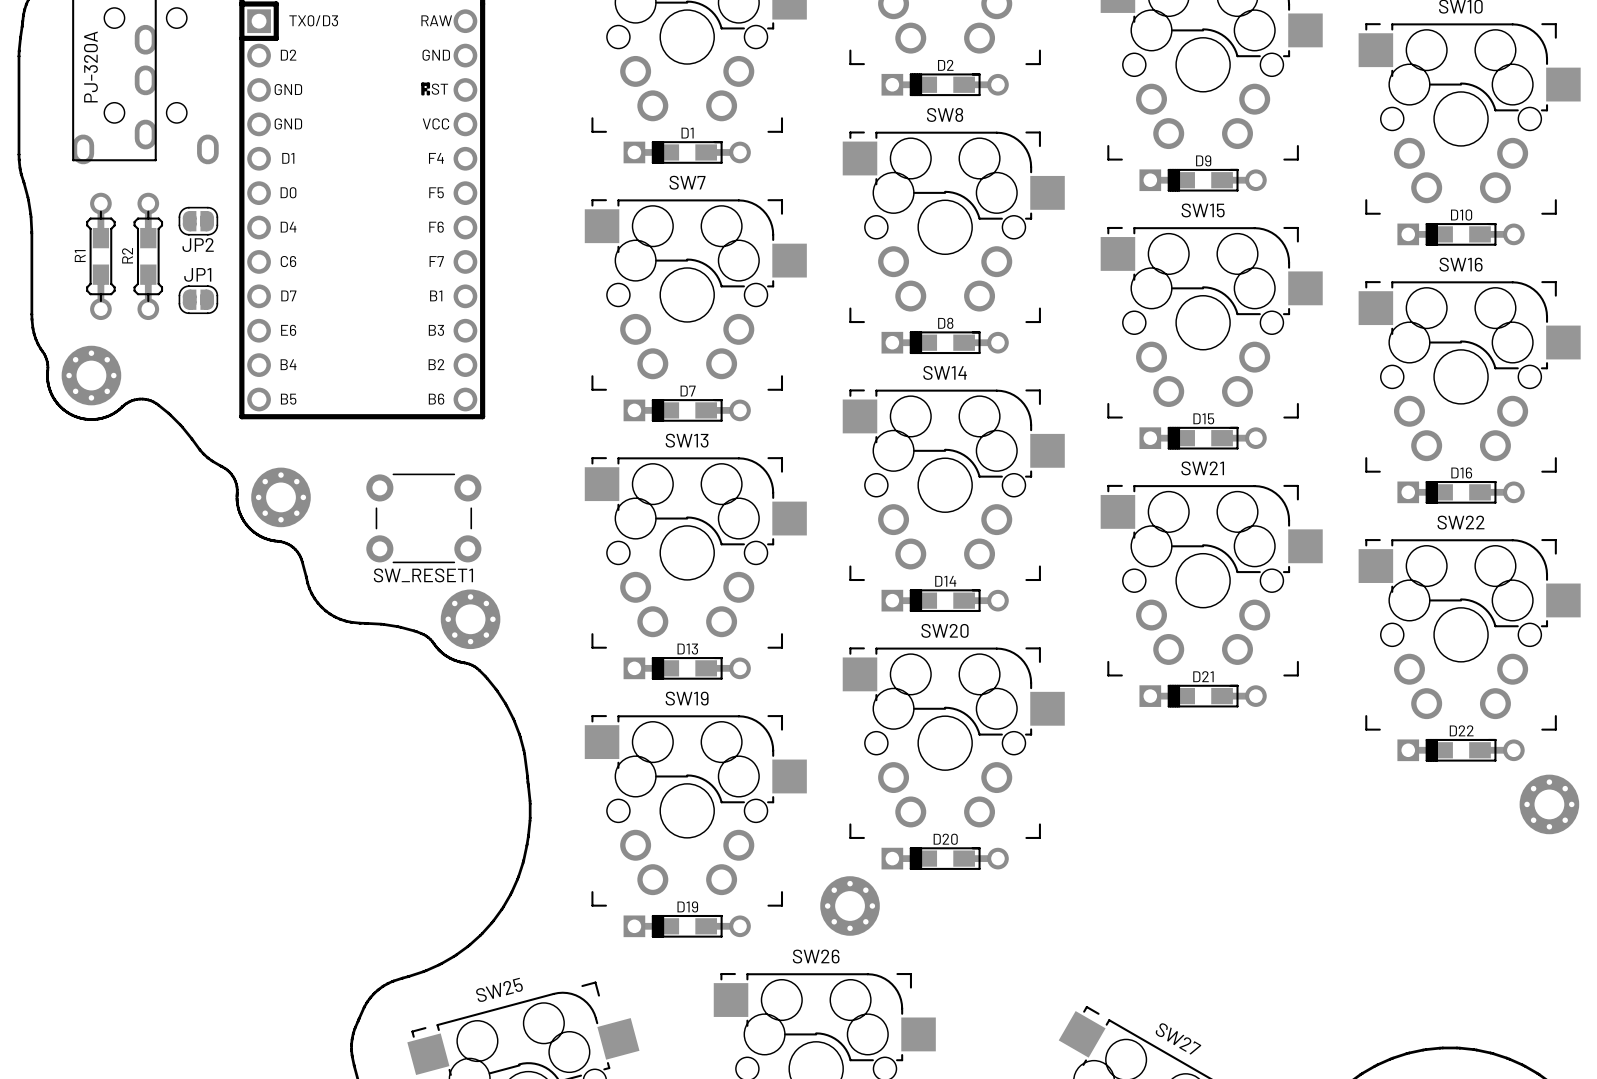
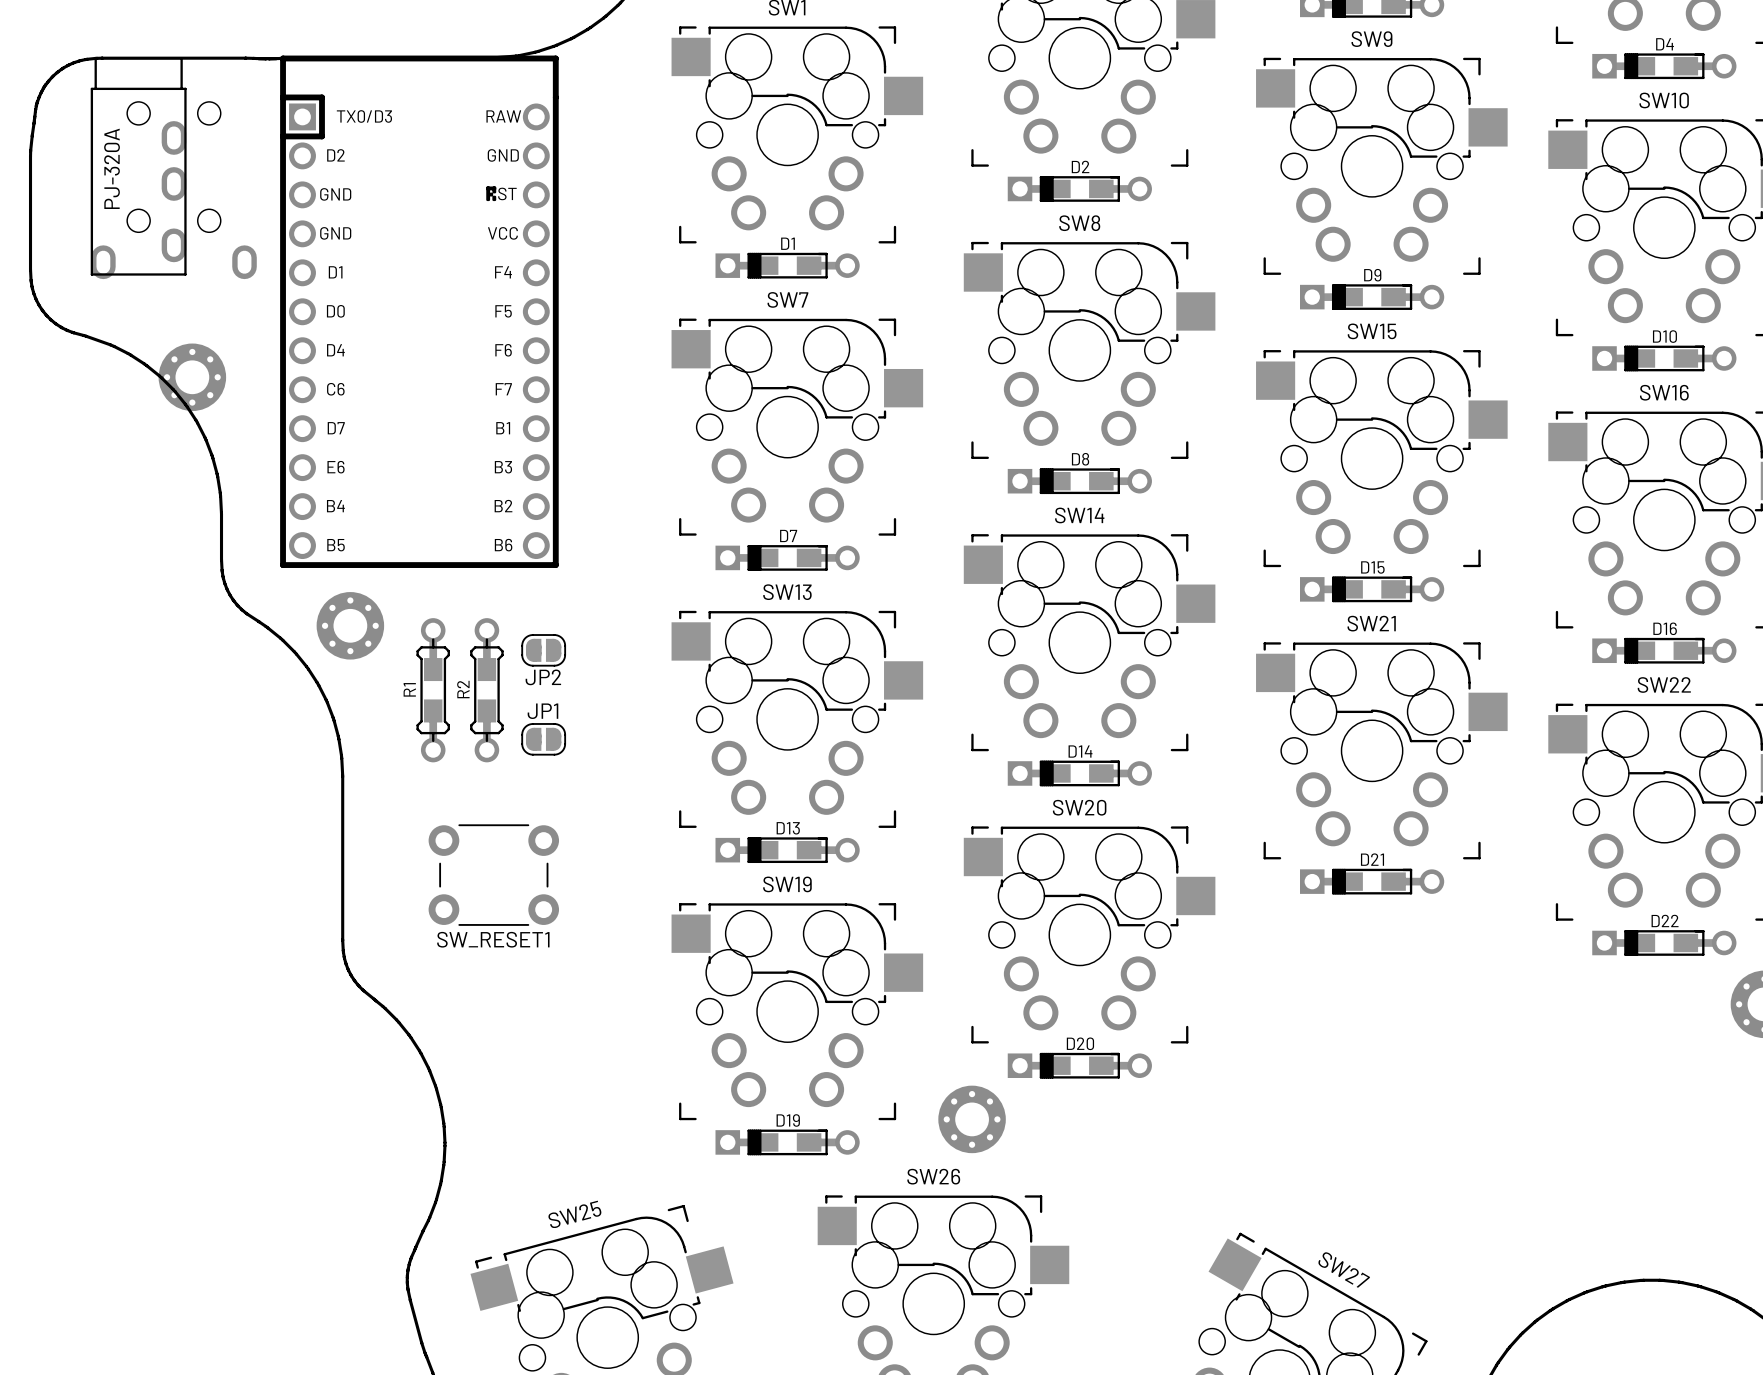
board edge: (18, 154) (20, 169) (31, 217) (32, 327) (36, 339) (46, 359) (50, 391) (63, 409) (83, 418) (104, 417) (122, 407) -> none
JP2 position: (198, 221) -> (543, 650)
part: none -> (192, 377)
R1 position: (100, 256) -> (433, 690)
R2 position: (148, 256) -> (486, 690)
JP1 position: (198, 299) -> (543, 739)
part: (91, 375) -> none
board edge: (122, 406) (131, 400) (139, 399) (156, 403) (180, 424) (204, 454) (229, 471) (236, 484) (238, 507) (244, 522) (260, 536) (286, 543) (295, 549) (301, 559) (311, 592) (326, 611) (346, 621) (397, 626) (426, 635) (447, 656) (472, 665) (479, 670) (497, 691) (514, 721) (524, 753) (530, 817) (523, 860) (510, 894) (491, 922) (467, 946) (439, 964) (383, 985) (370, 997) (364, 1007) -> (30, 267) (31, 286) (35, 298) (42, 309) (51, 320) (67, 330) (110, 344) (130, 355) (161, 377) (187, 406) (204, 437) (217, 473) (221, 512) (222, 570) (227, 590) (241, 609) (280, 638) (296, 654) (317, 682) (327, 702) (338, 736) (341, 758) (342, 939) (345, 963) (358, 985) (385, 1008) (410, 1037) (429, 1070) (441, 1107) (444, 1142) (443, 1165) (436, 1199) (421, 1234)
part position: (281, 497) -> (350, 625)
SW_RESET1 position: (423, 518) -> (493, 875)
part: (470, 619) -> none

